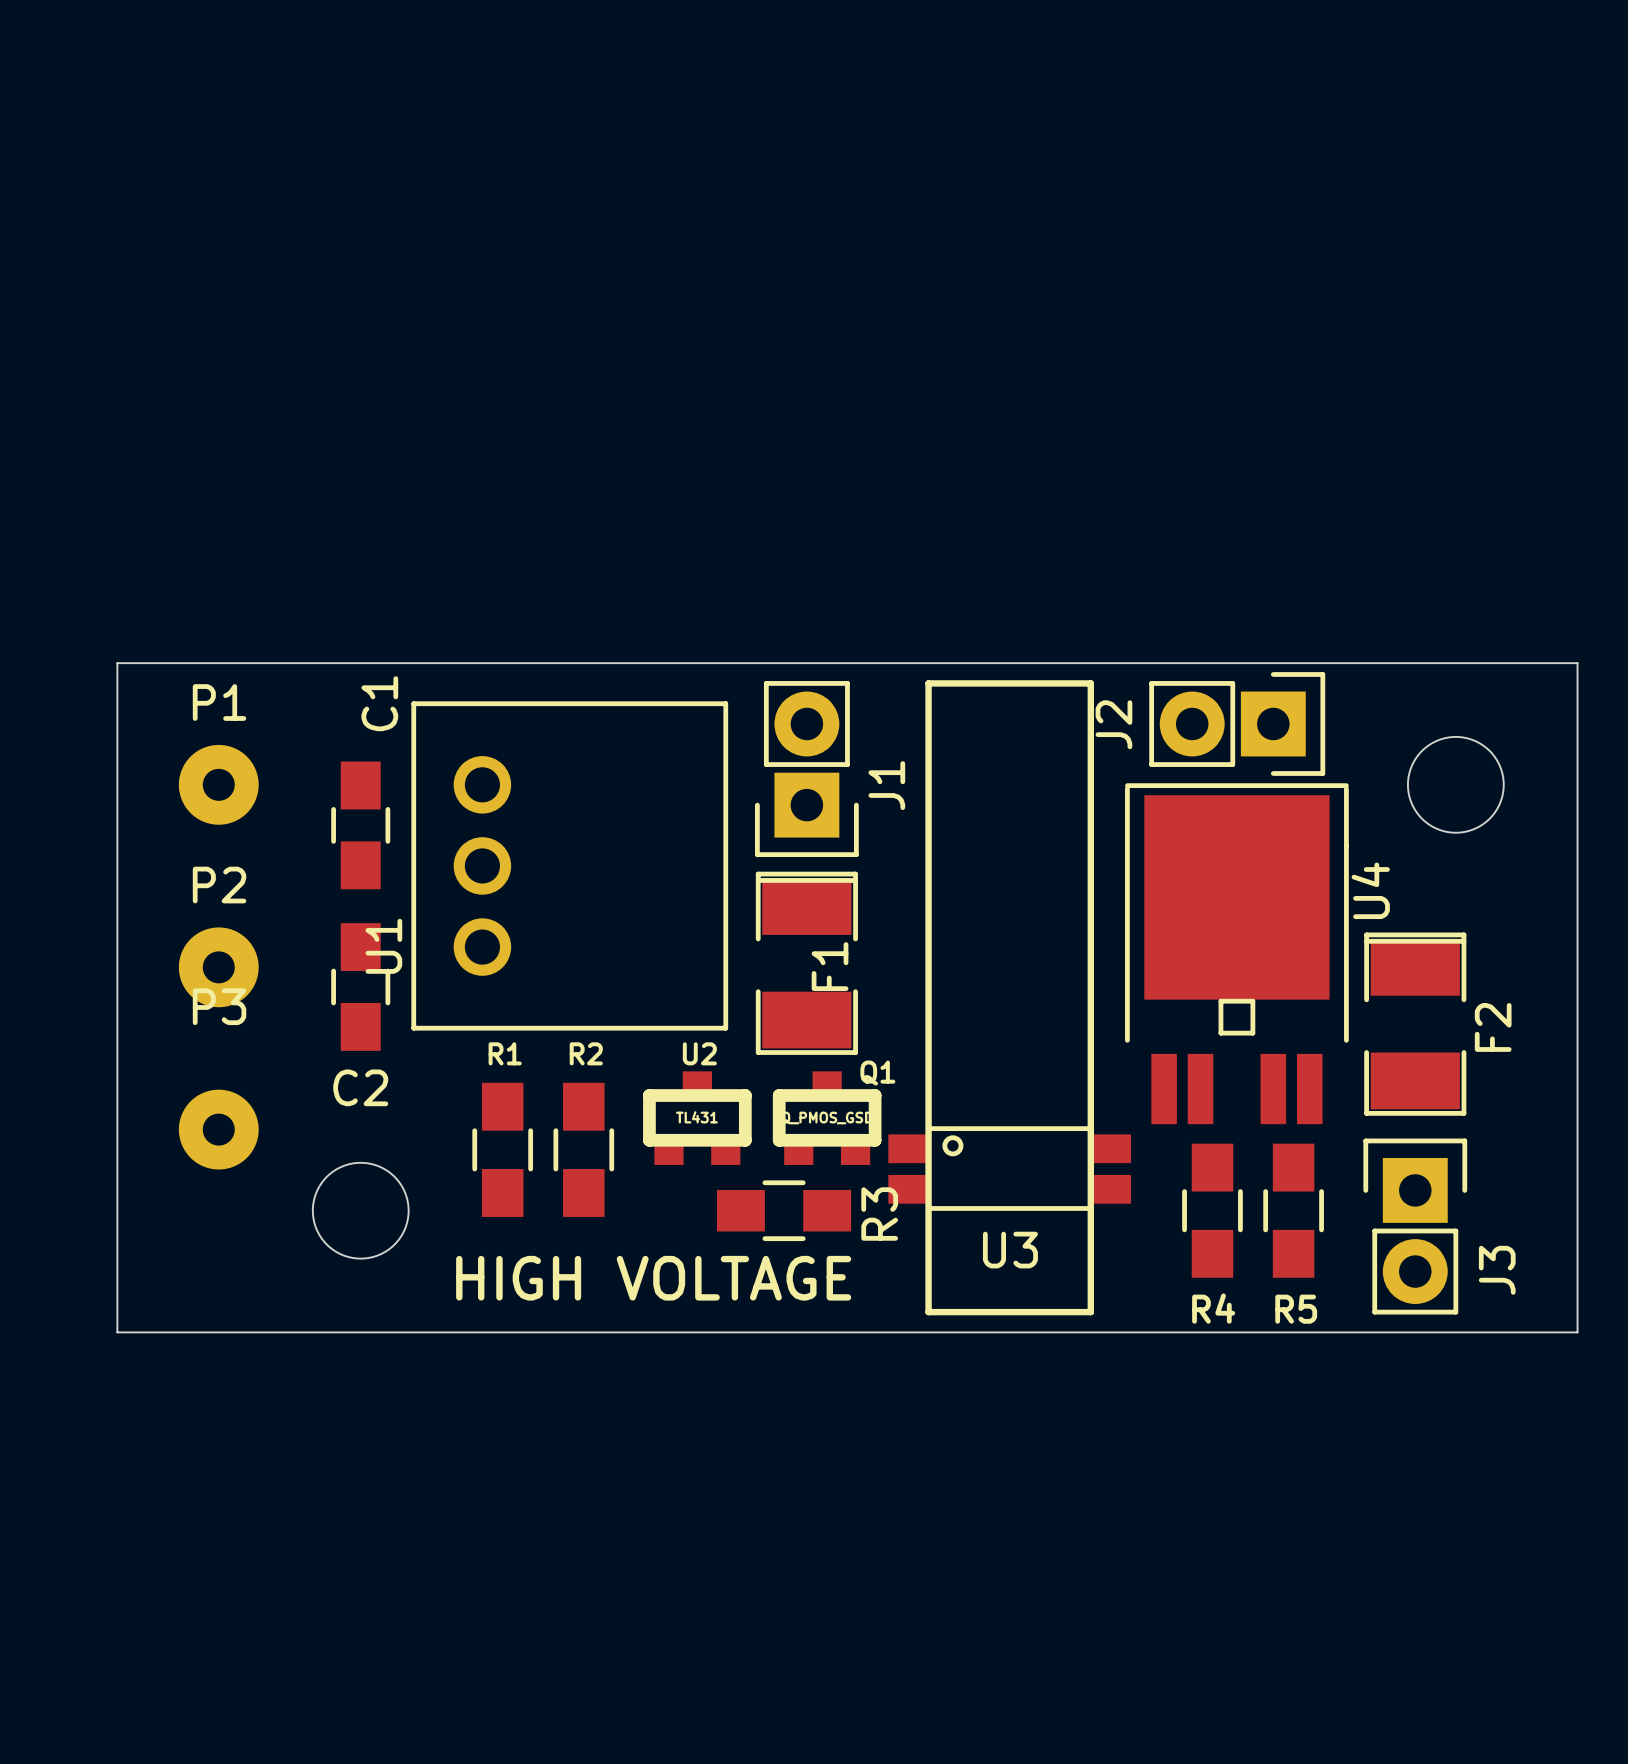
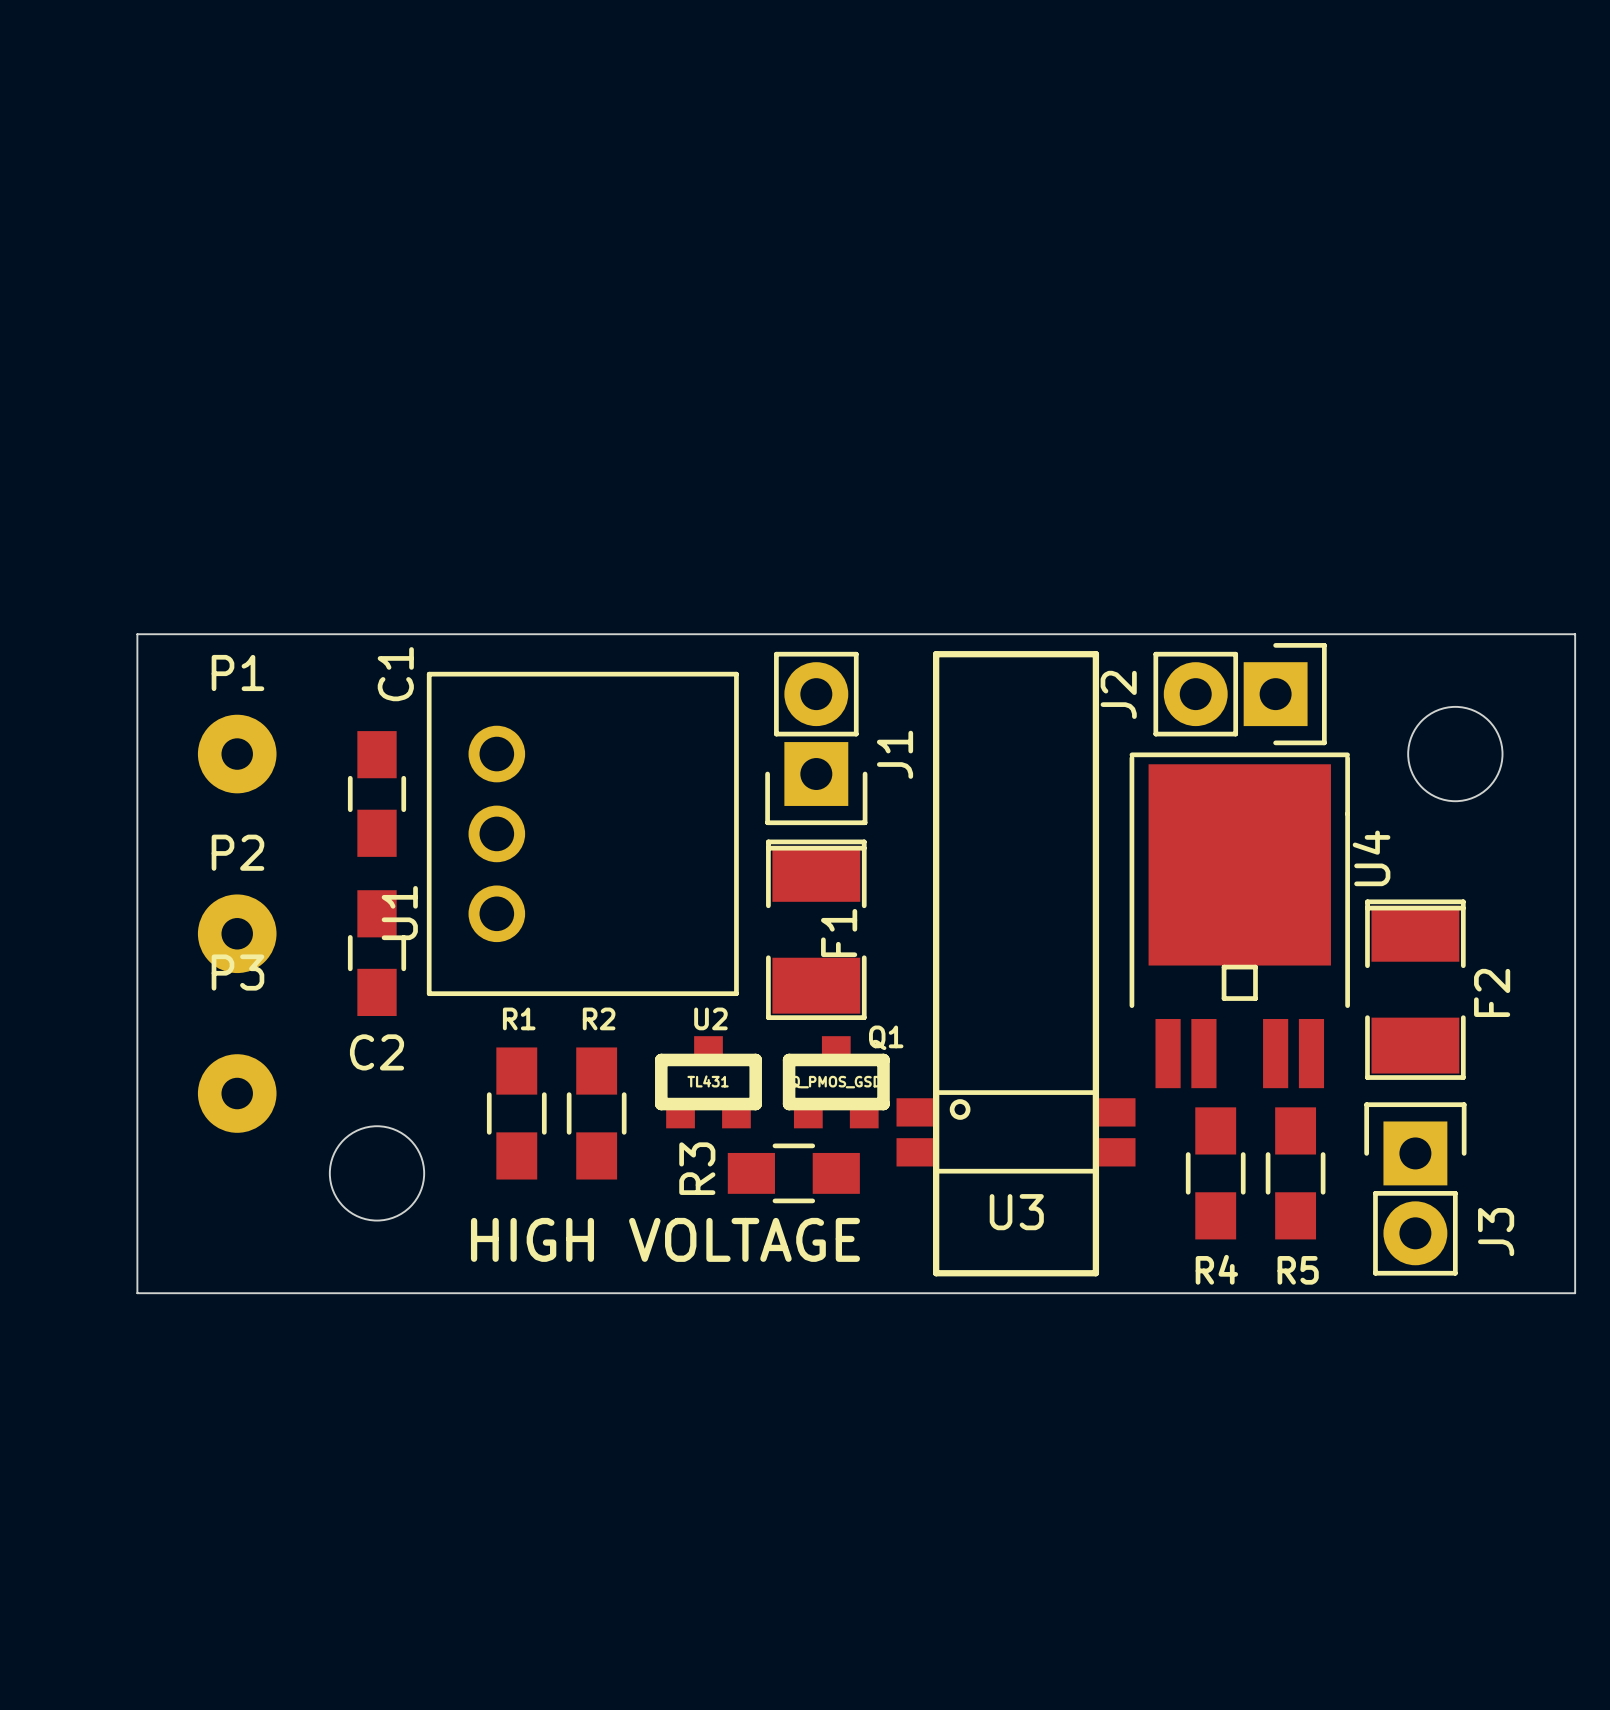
R3 name position: R3 (879, 1214) -> R3 (697, 1168)

